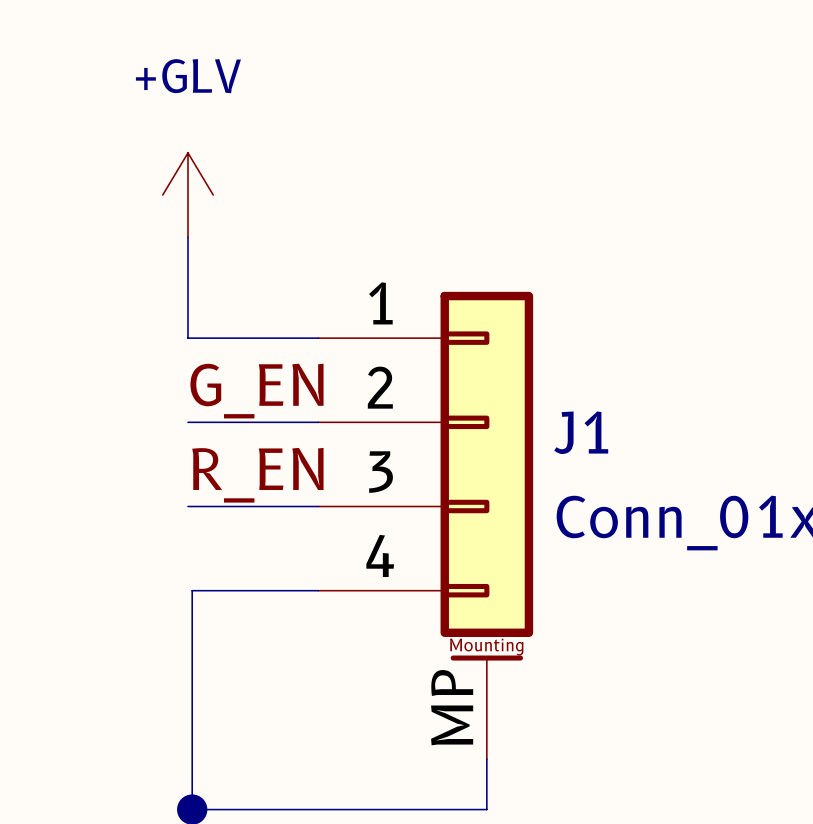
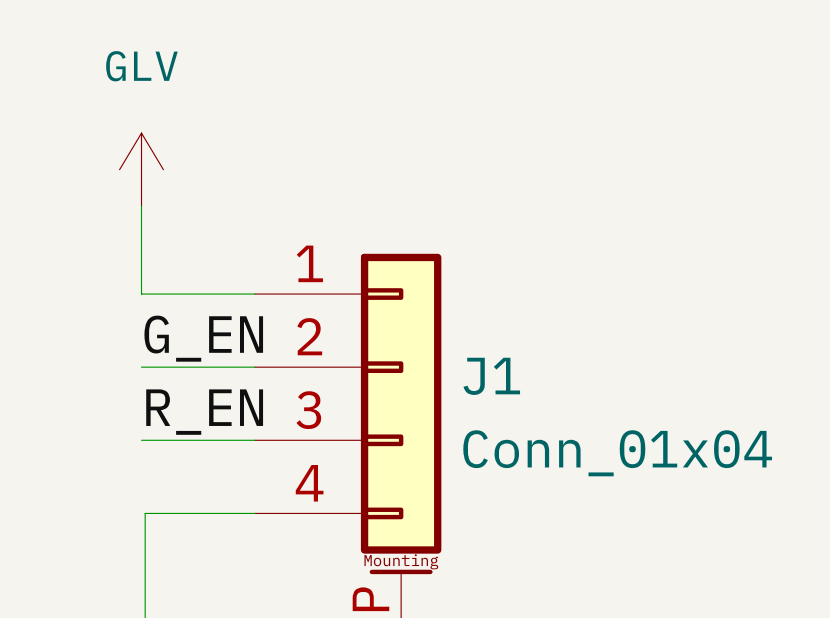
power symbol: +GLV (187, 195) -> GLV (141, 169)

